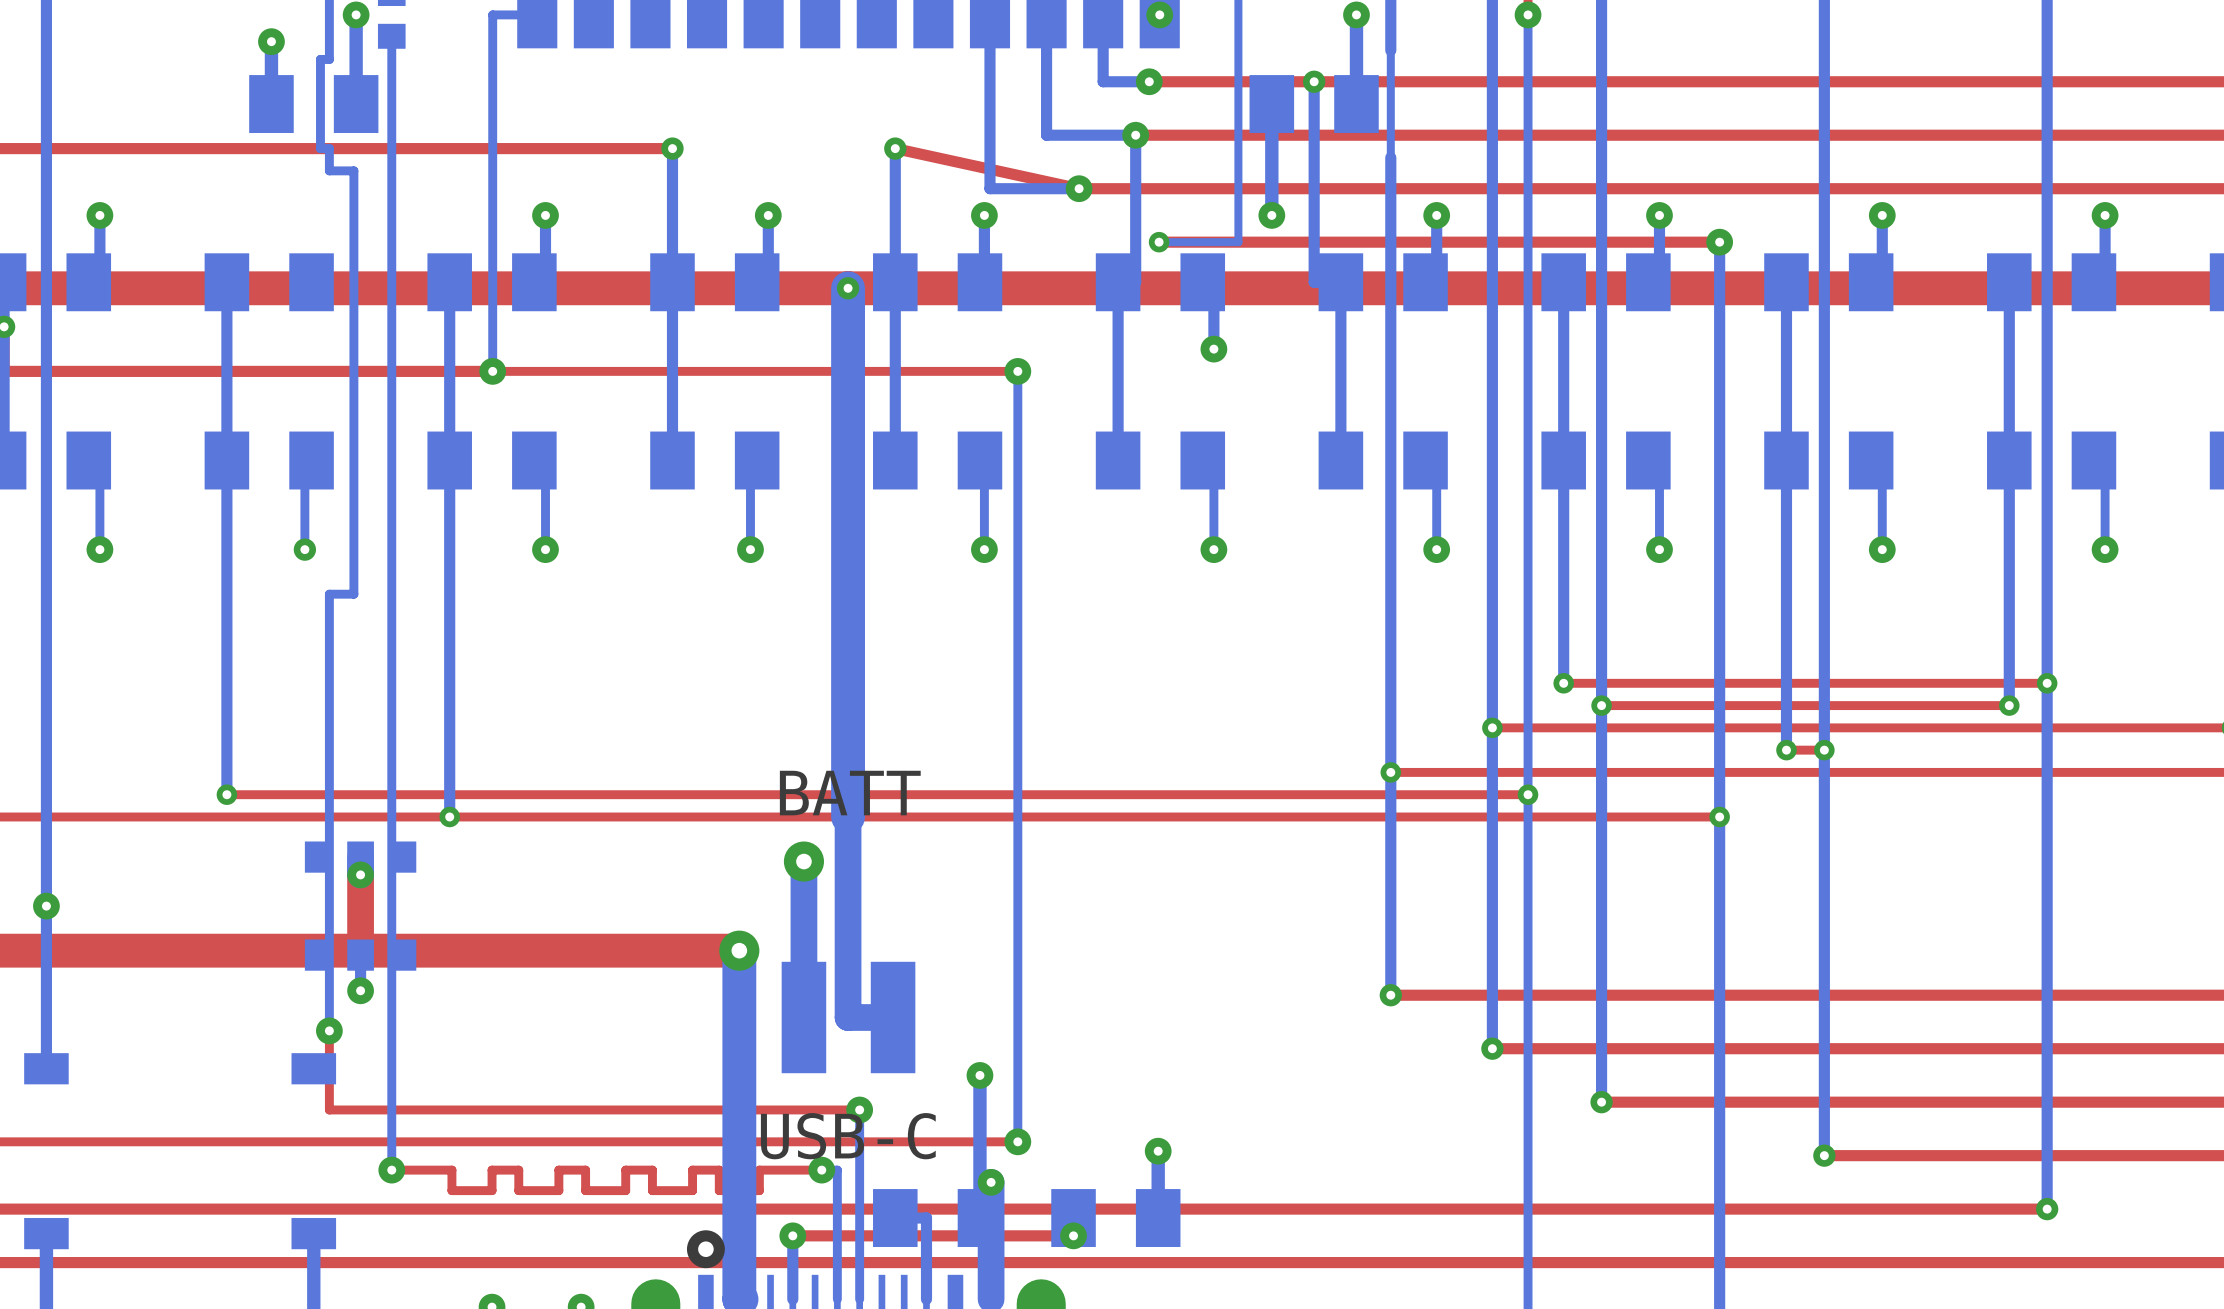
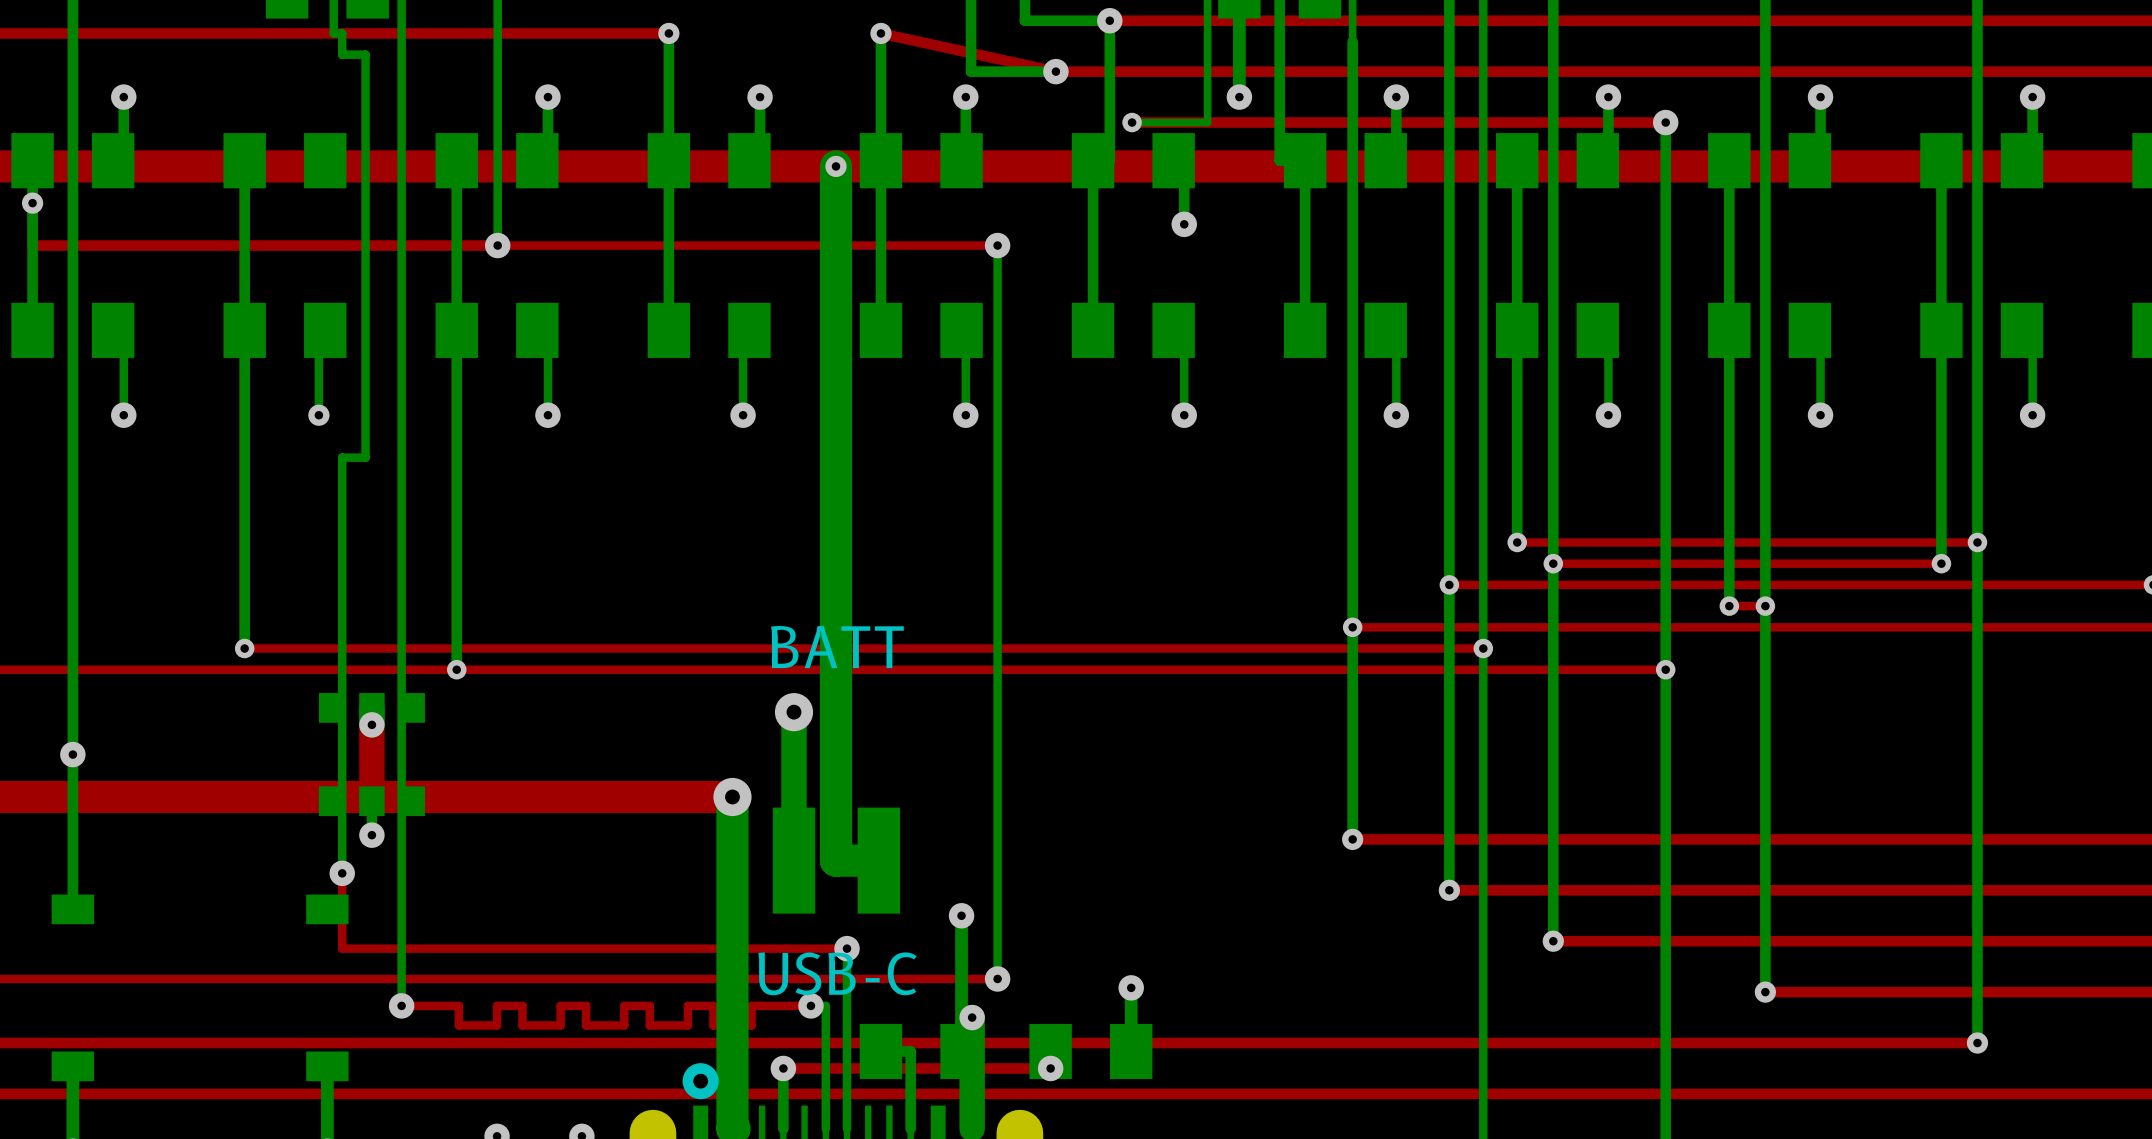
bottom track width: thin (848, 816) (848, 1017) (893, 1017) -> thick (835, 669) (835, 860) (878, 860)

